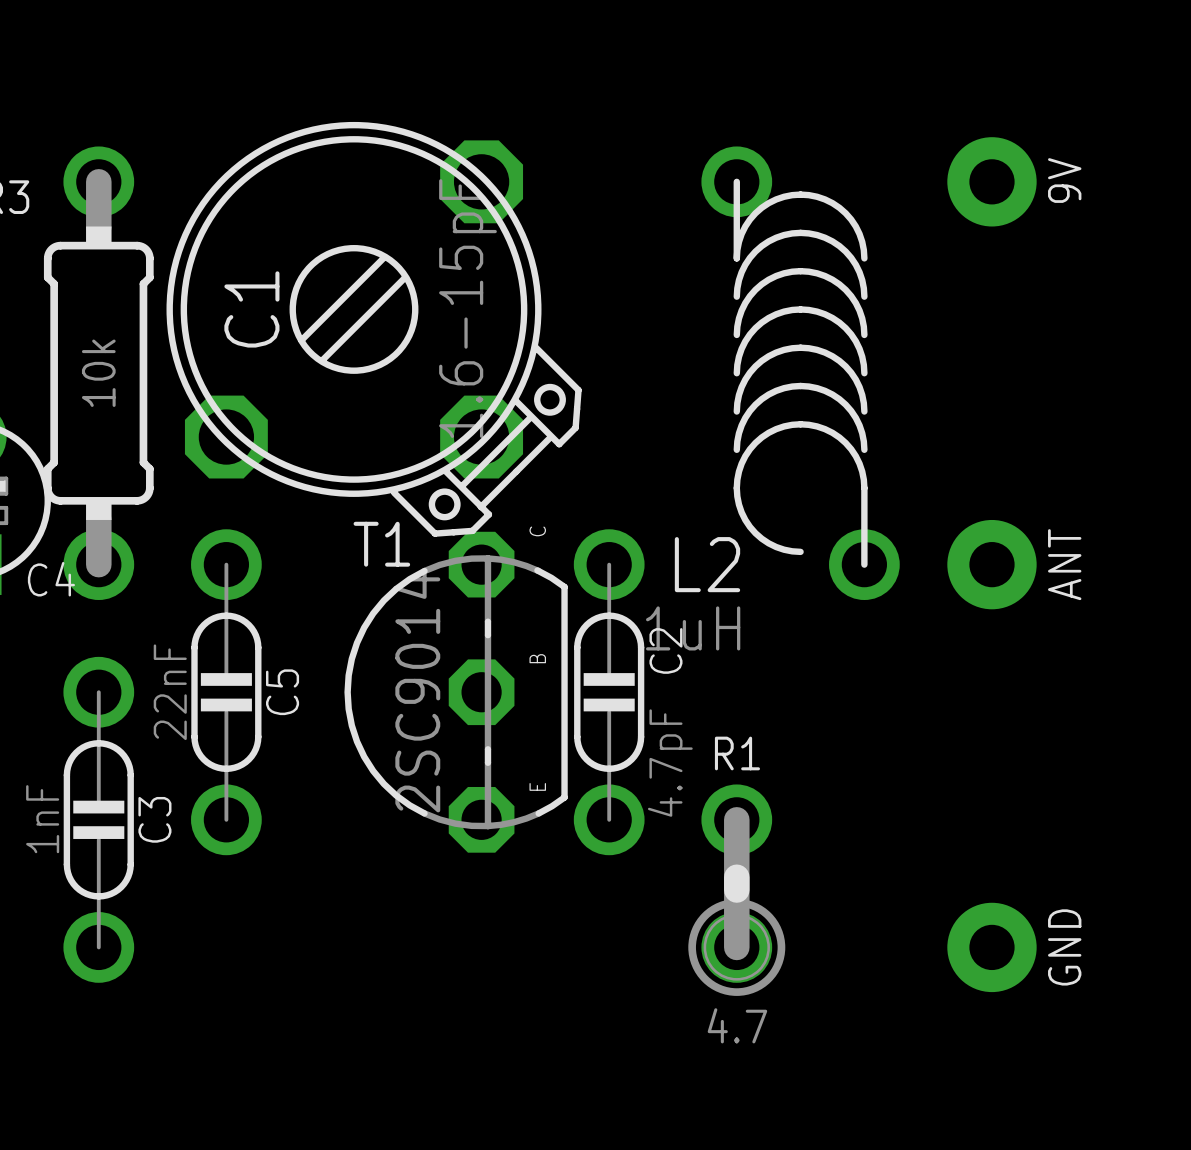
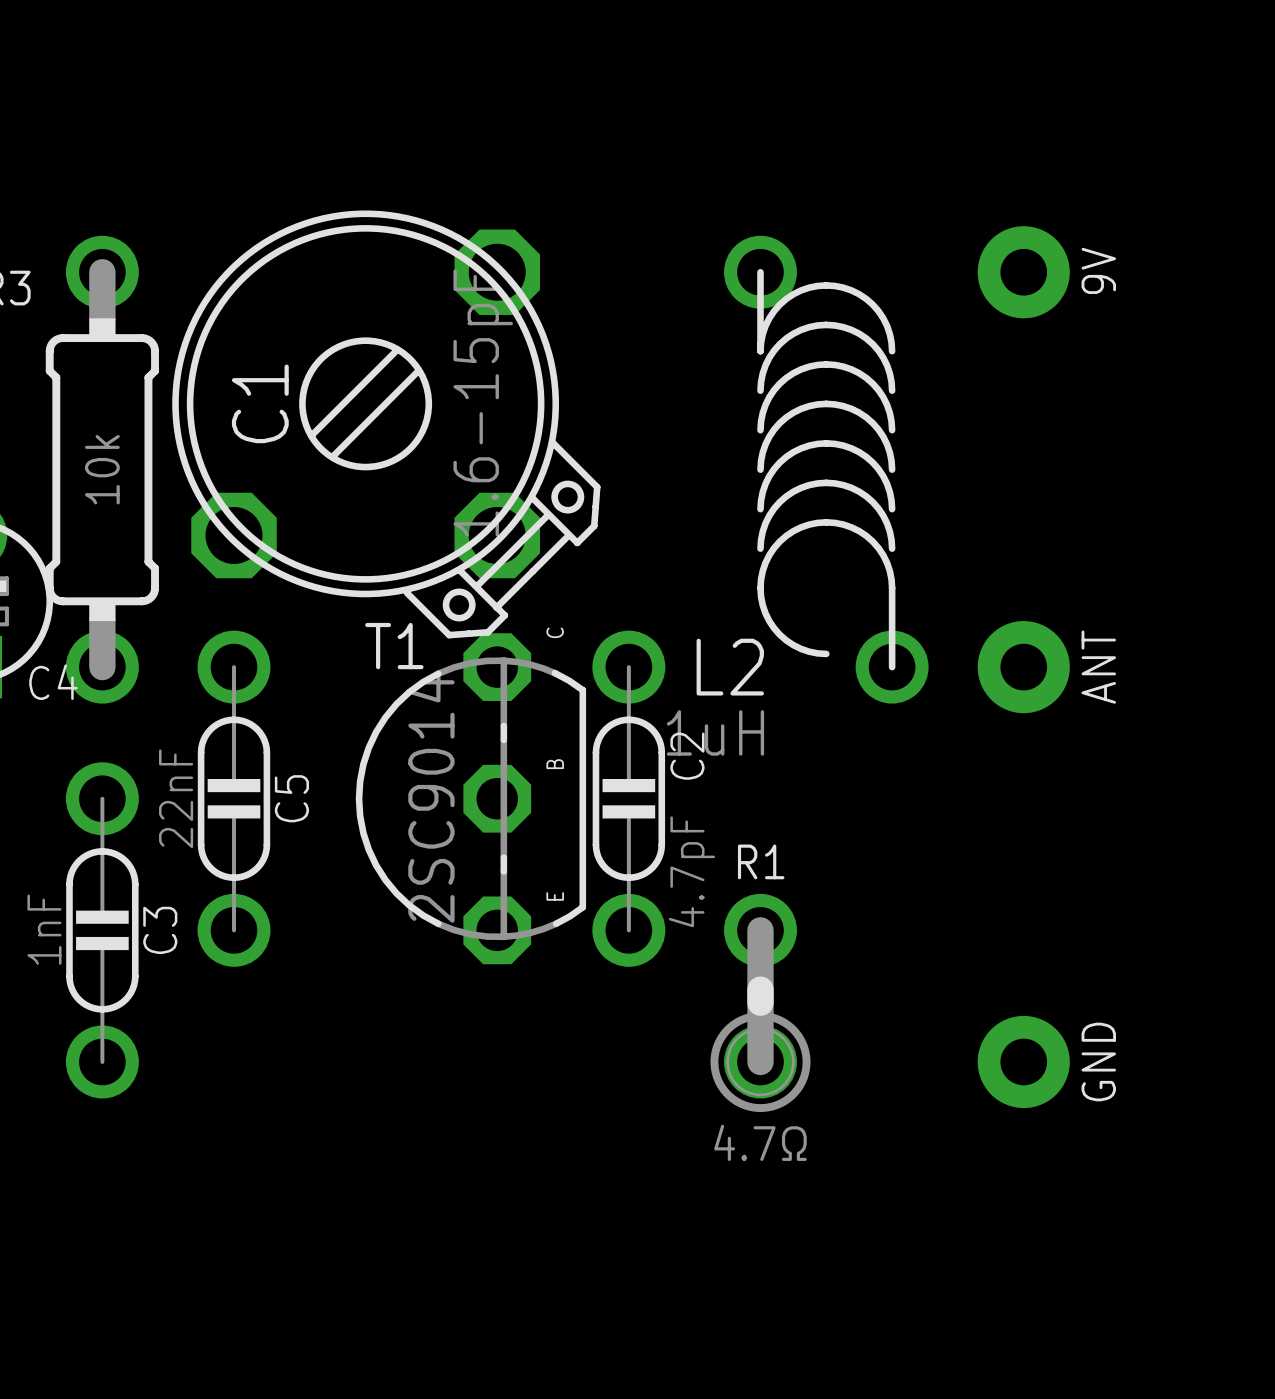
R1 value: 4.7 (737, 1025) -> 4.7Ω (760, 1142)

